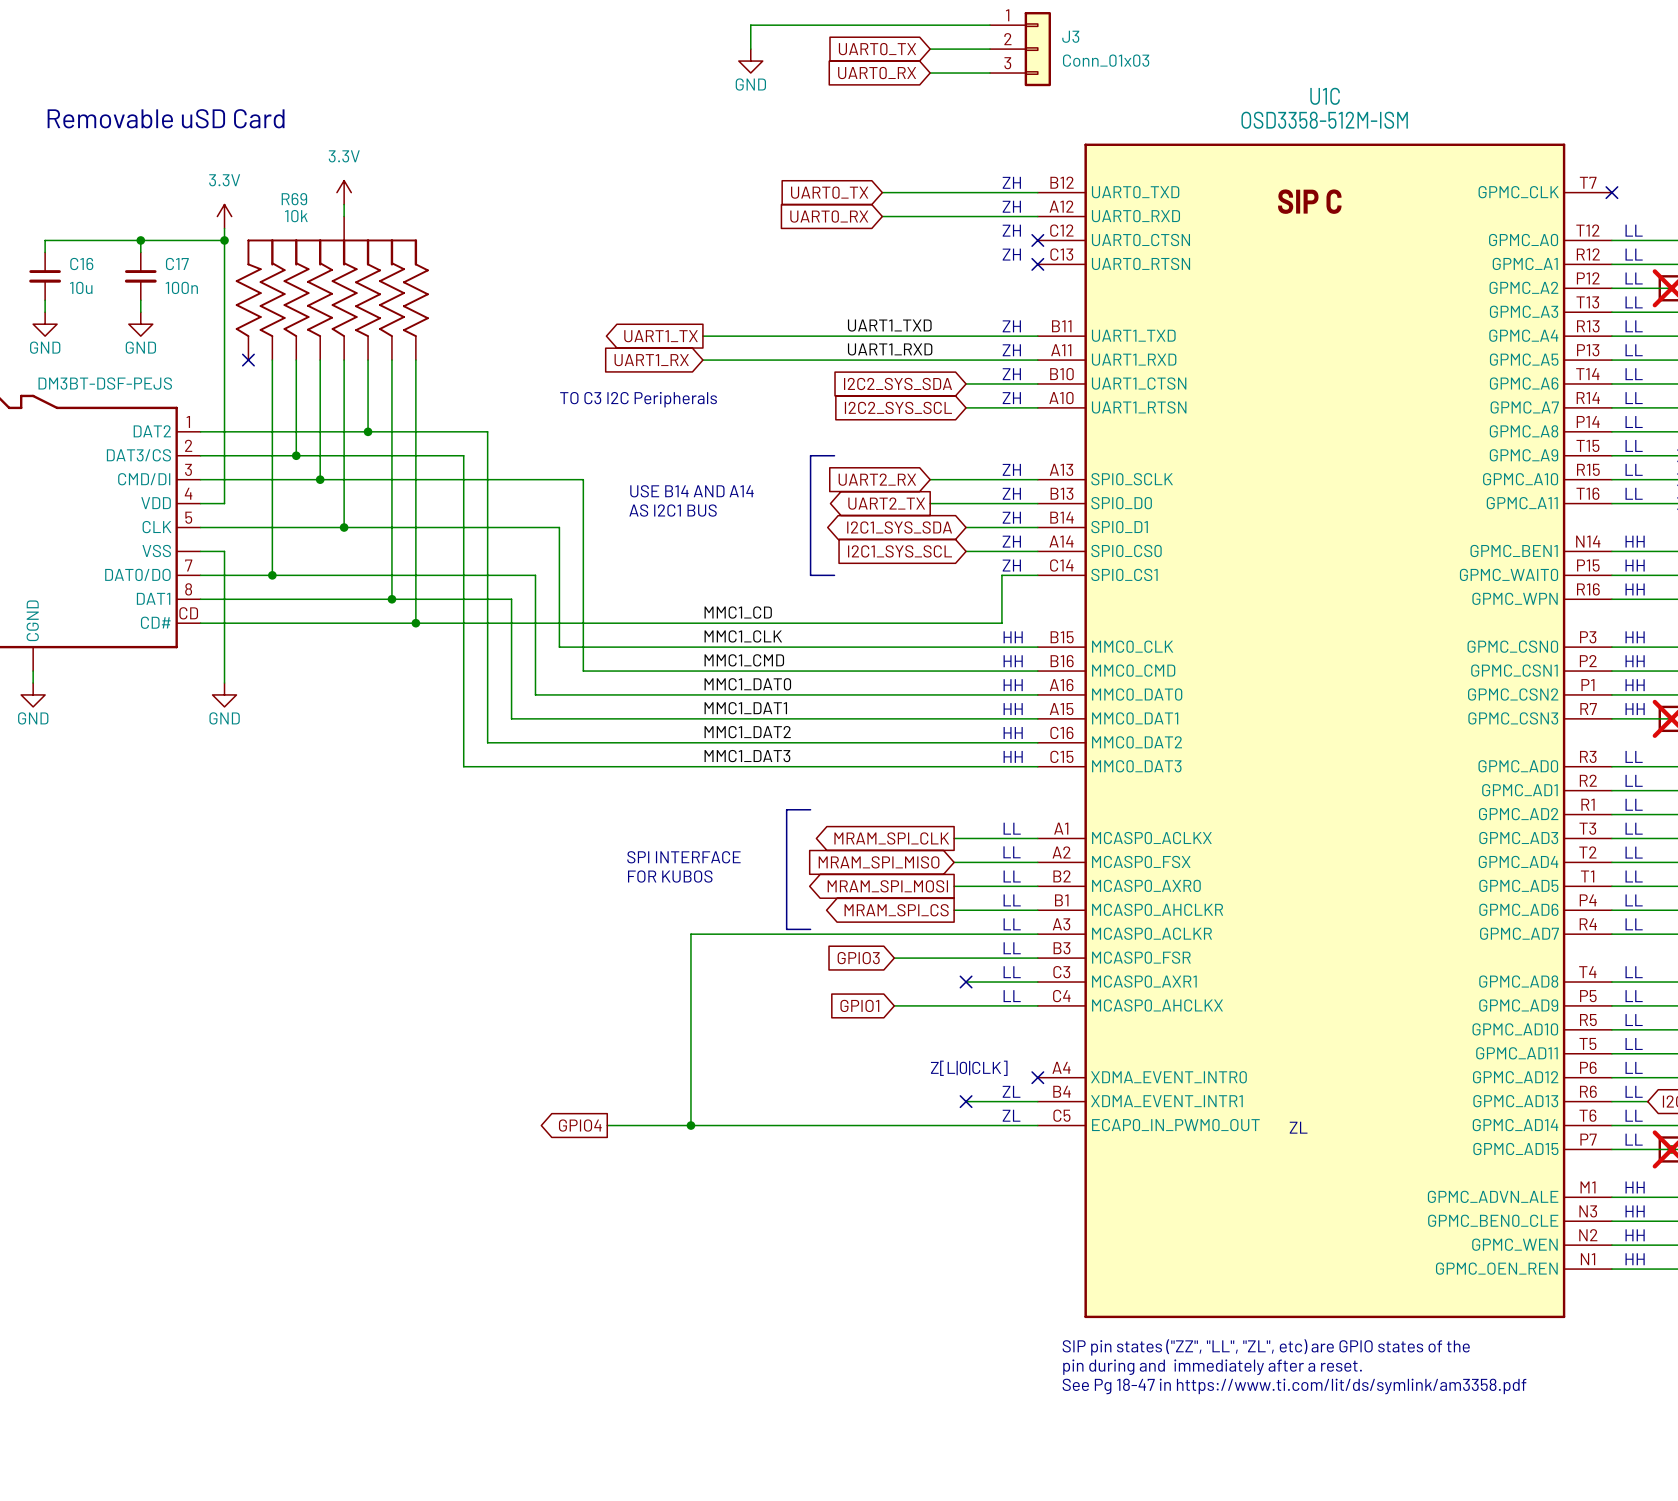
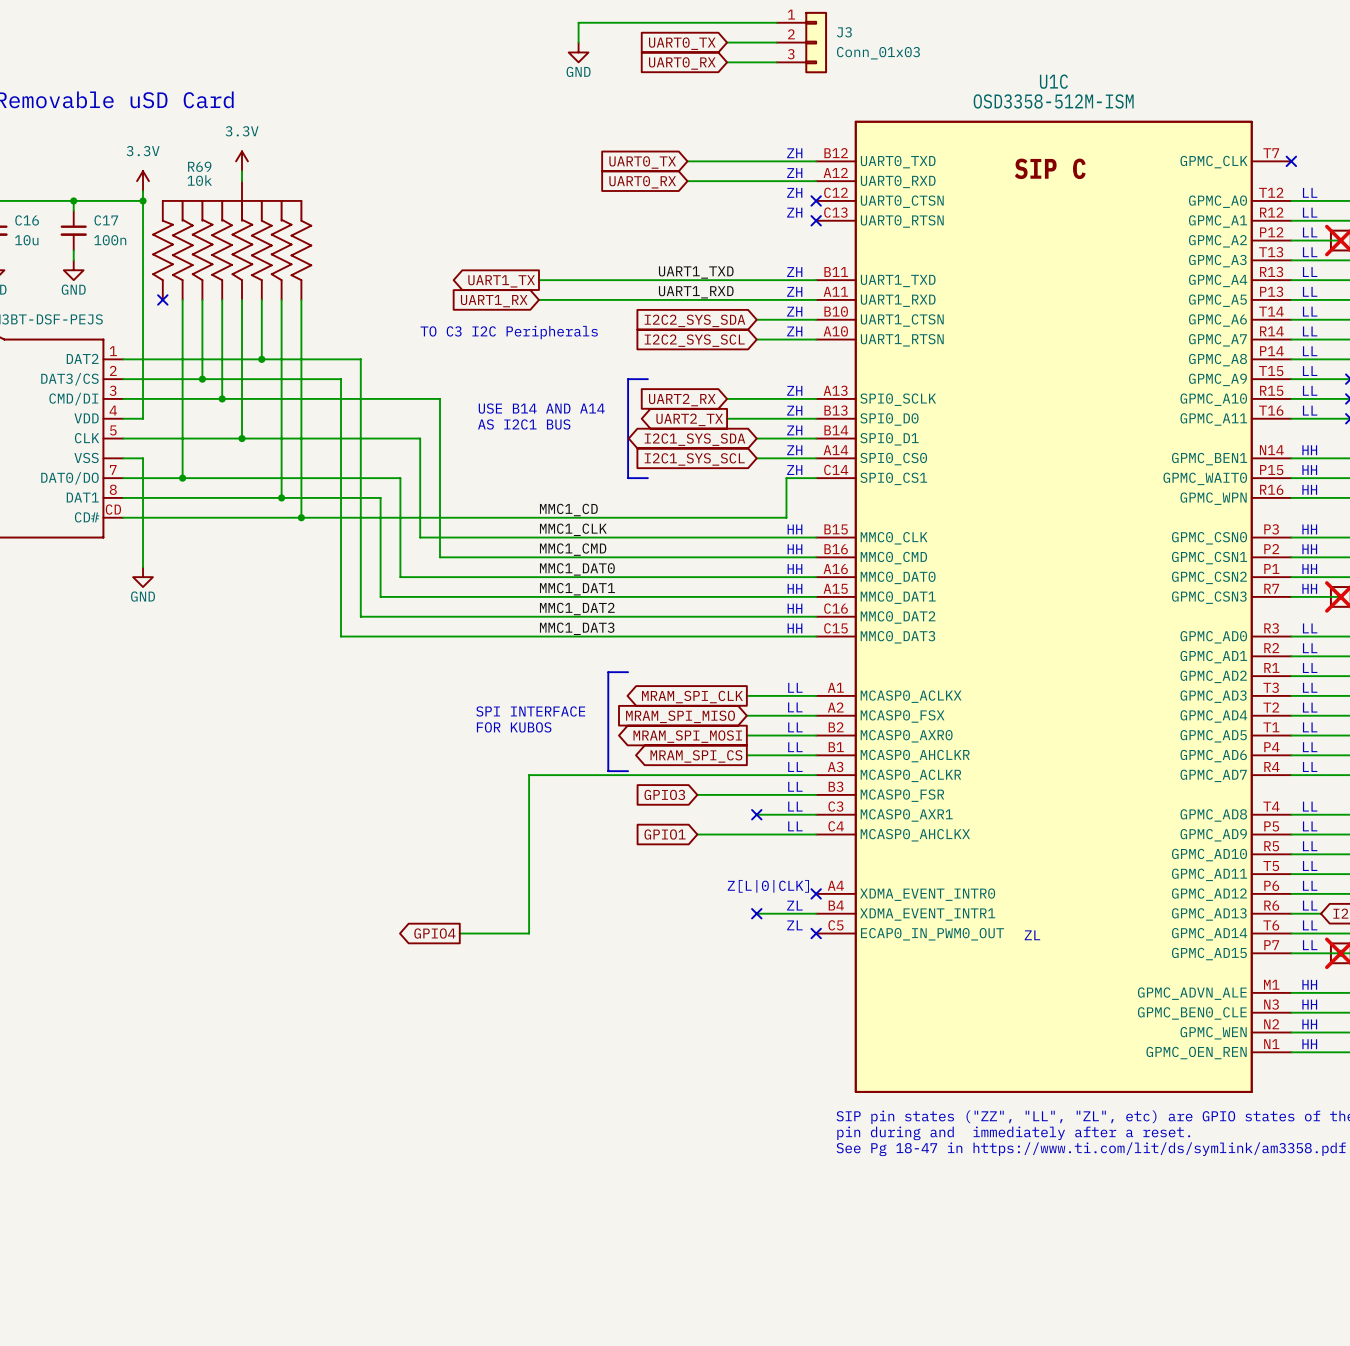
wire: (690, 1125) (1037, 1125) -> none
junction: (690, 1125) -> none
no-connect mark: none -> (816, 933)

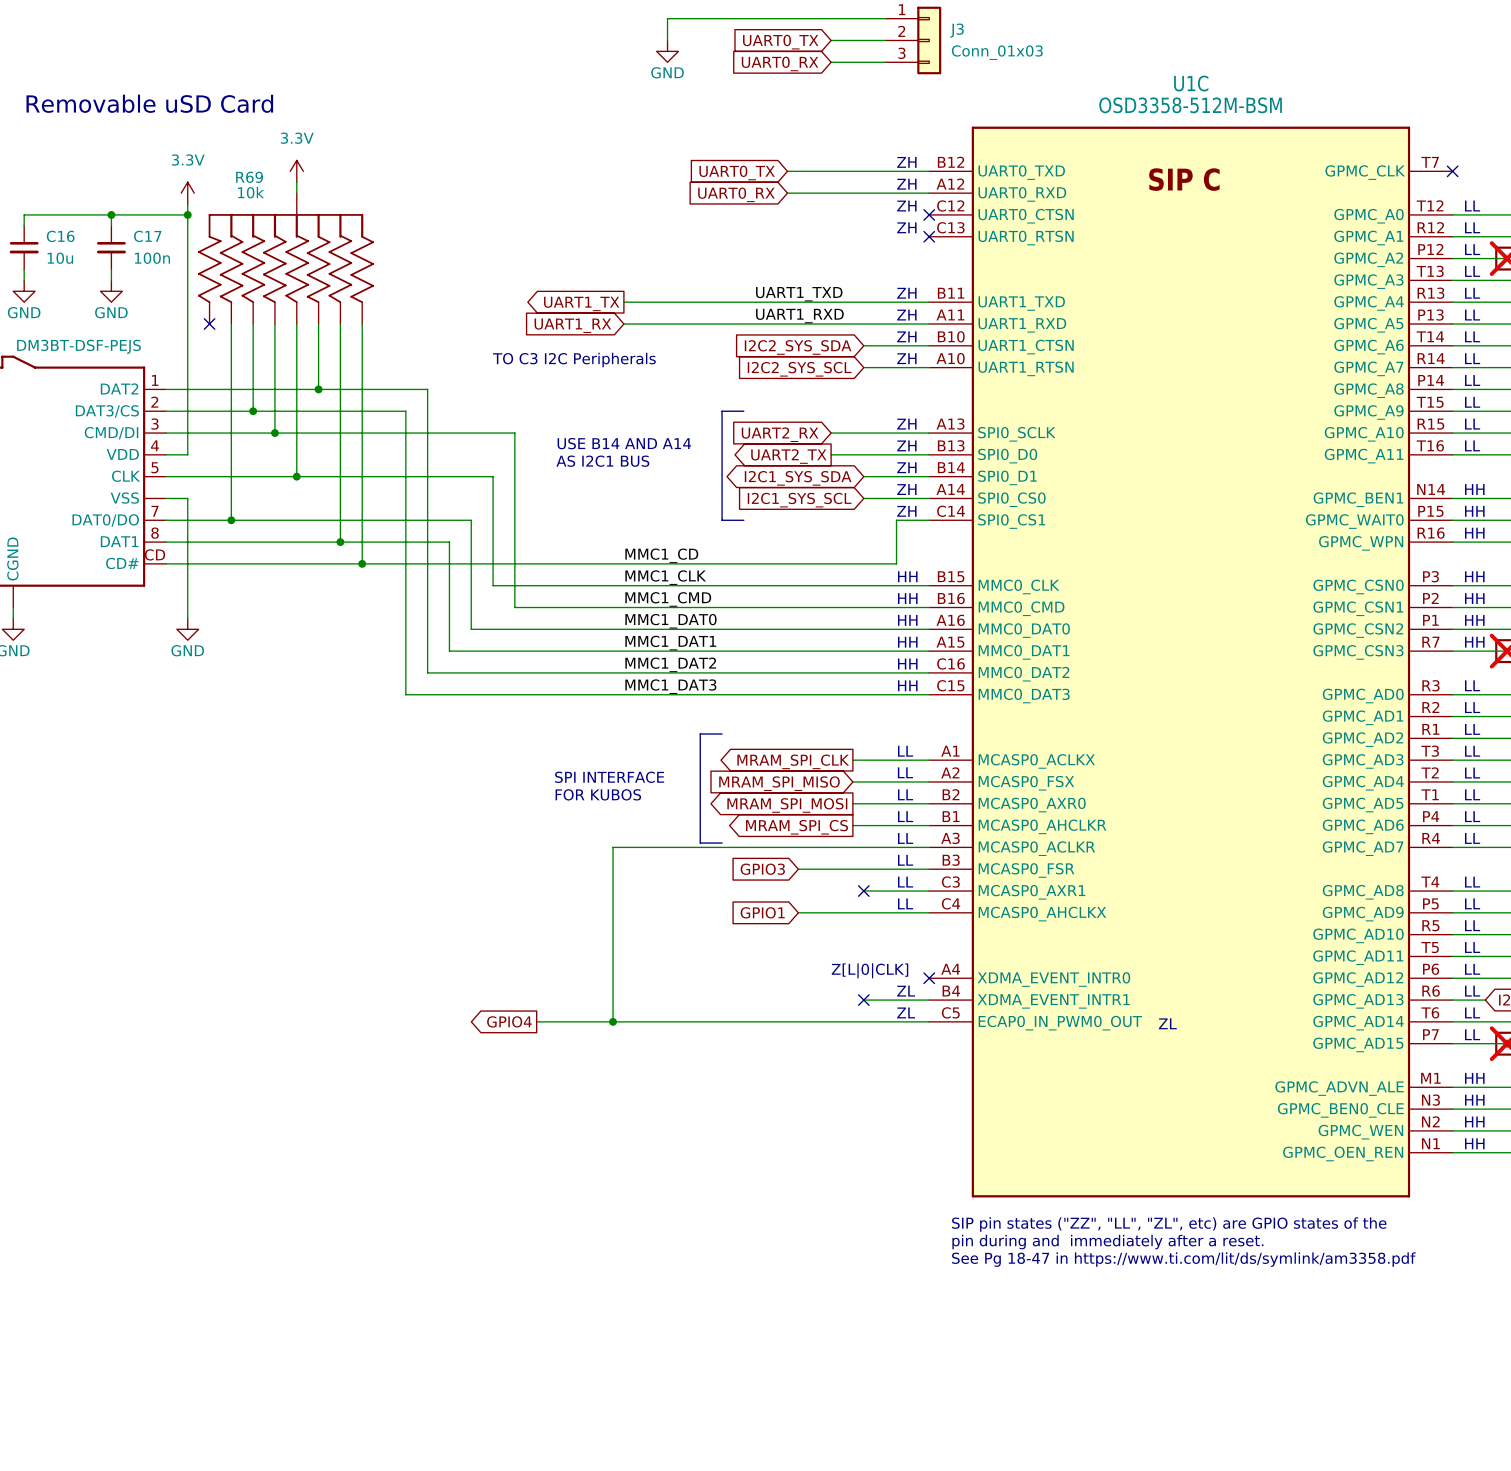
U1C value: OSD3358-512M-ISM (1053, 101) -> OSD3358-512M-BSM (1190, 105)
wire: none -> (613, 1021) (929, 1021)
junction: none -> (613, 1021)
no-connect mark: (816, 933) -> none

